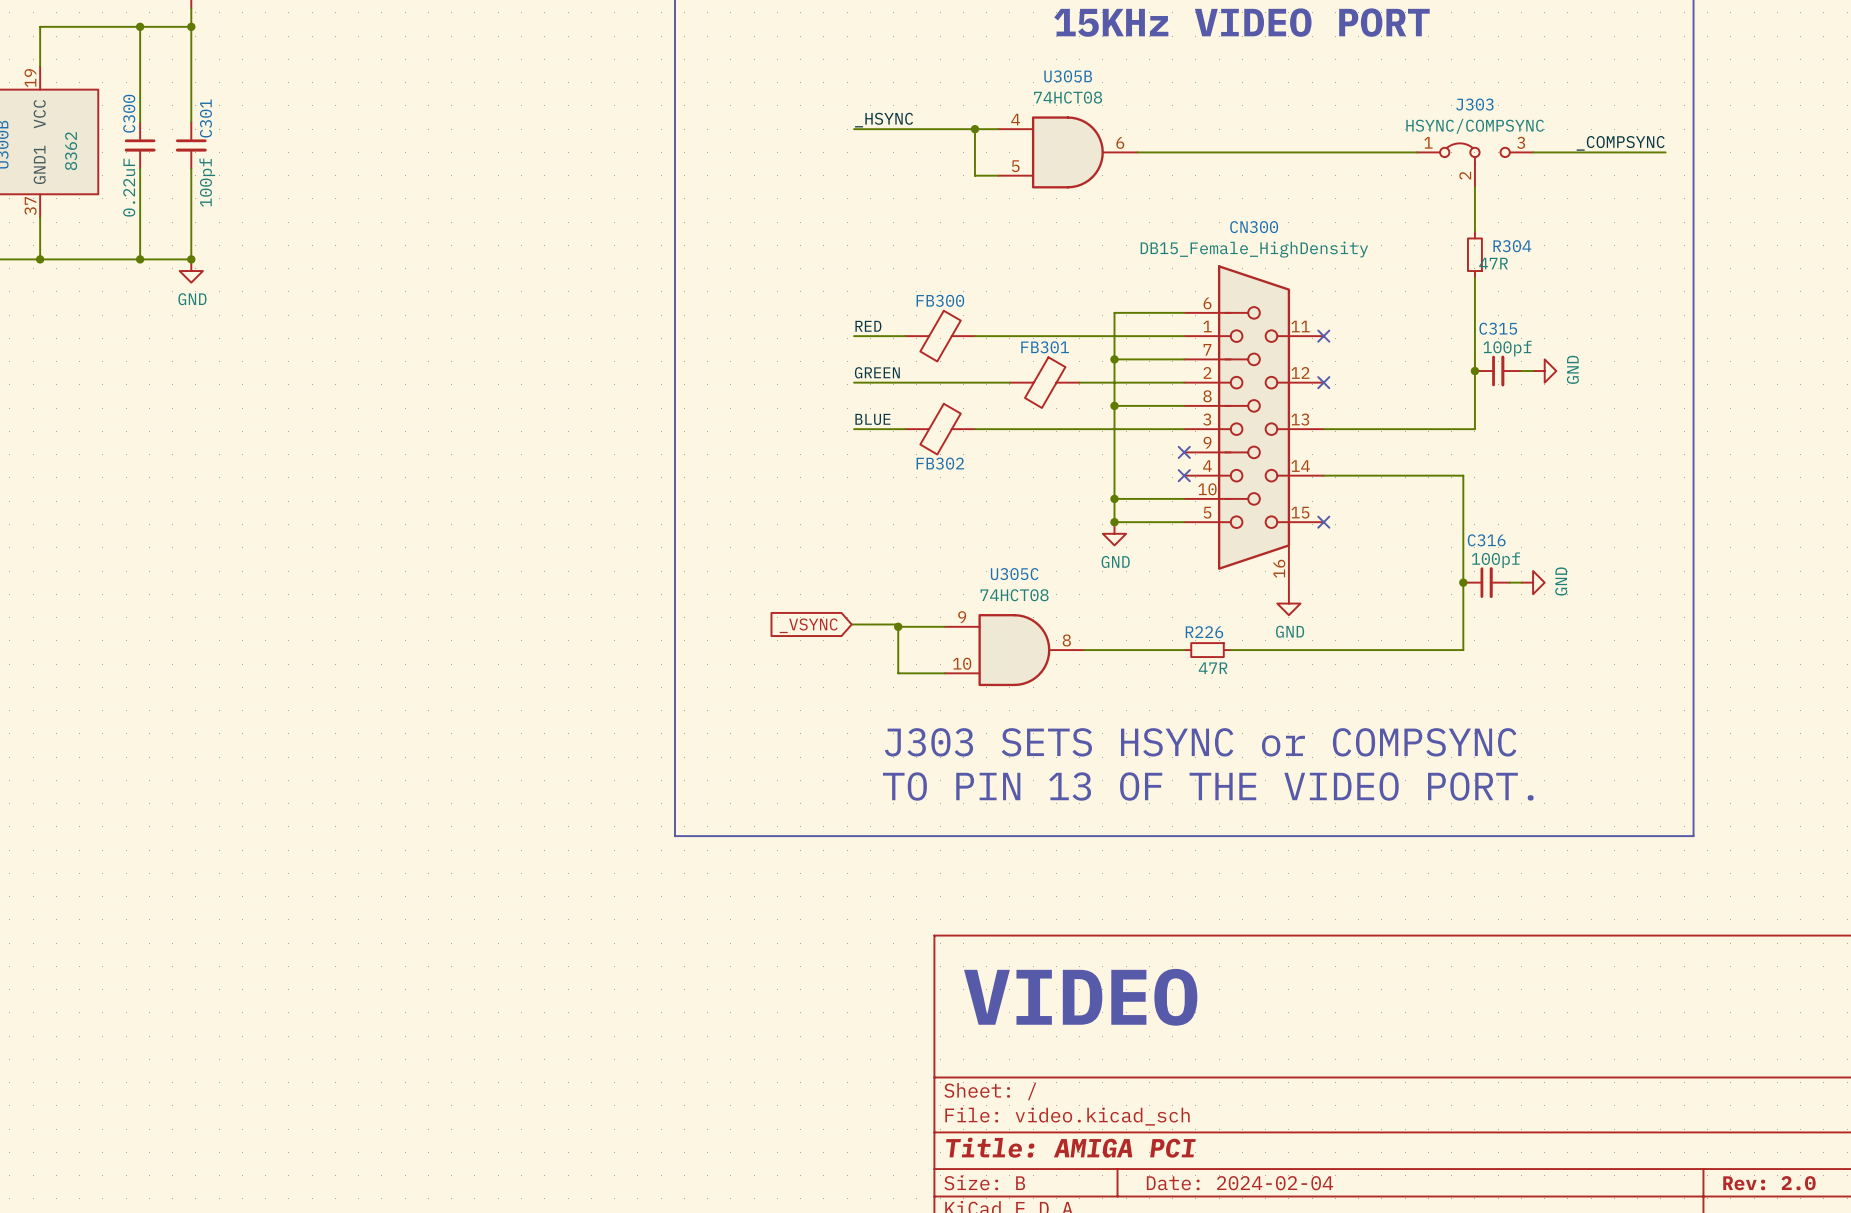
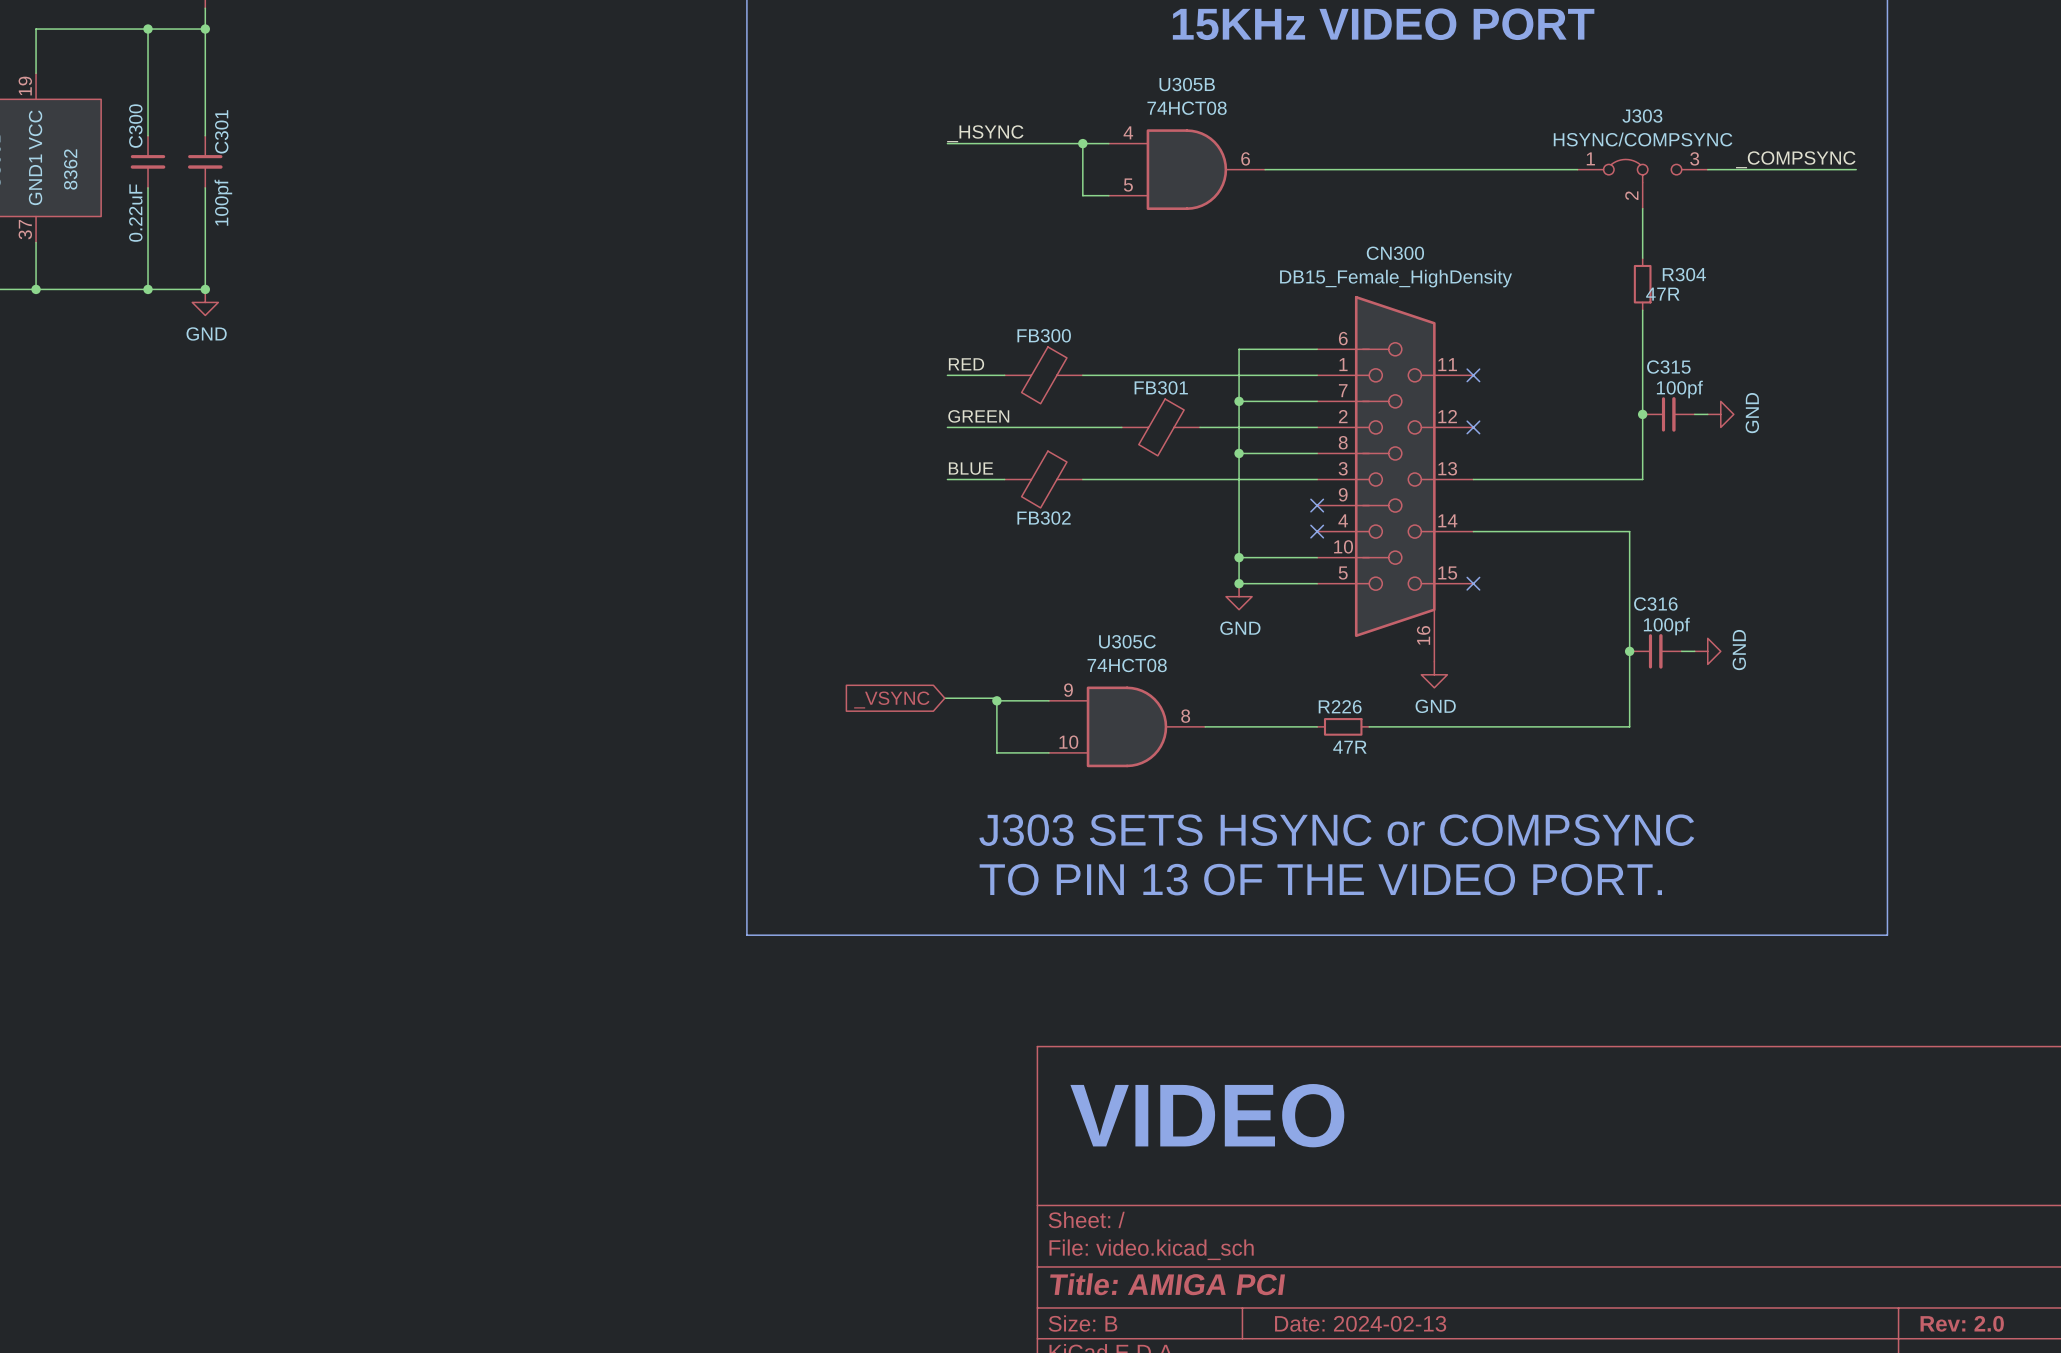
title block: Date: 2024-02-04 (1239, 1183) -> Date: 2024-02-13 (1360, 1323)

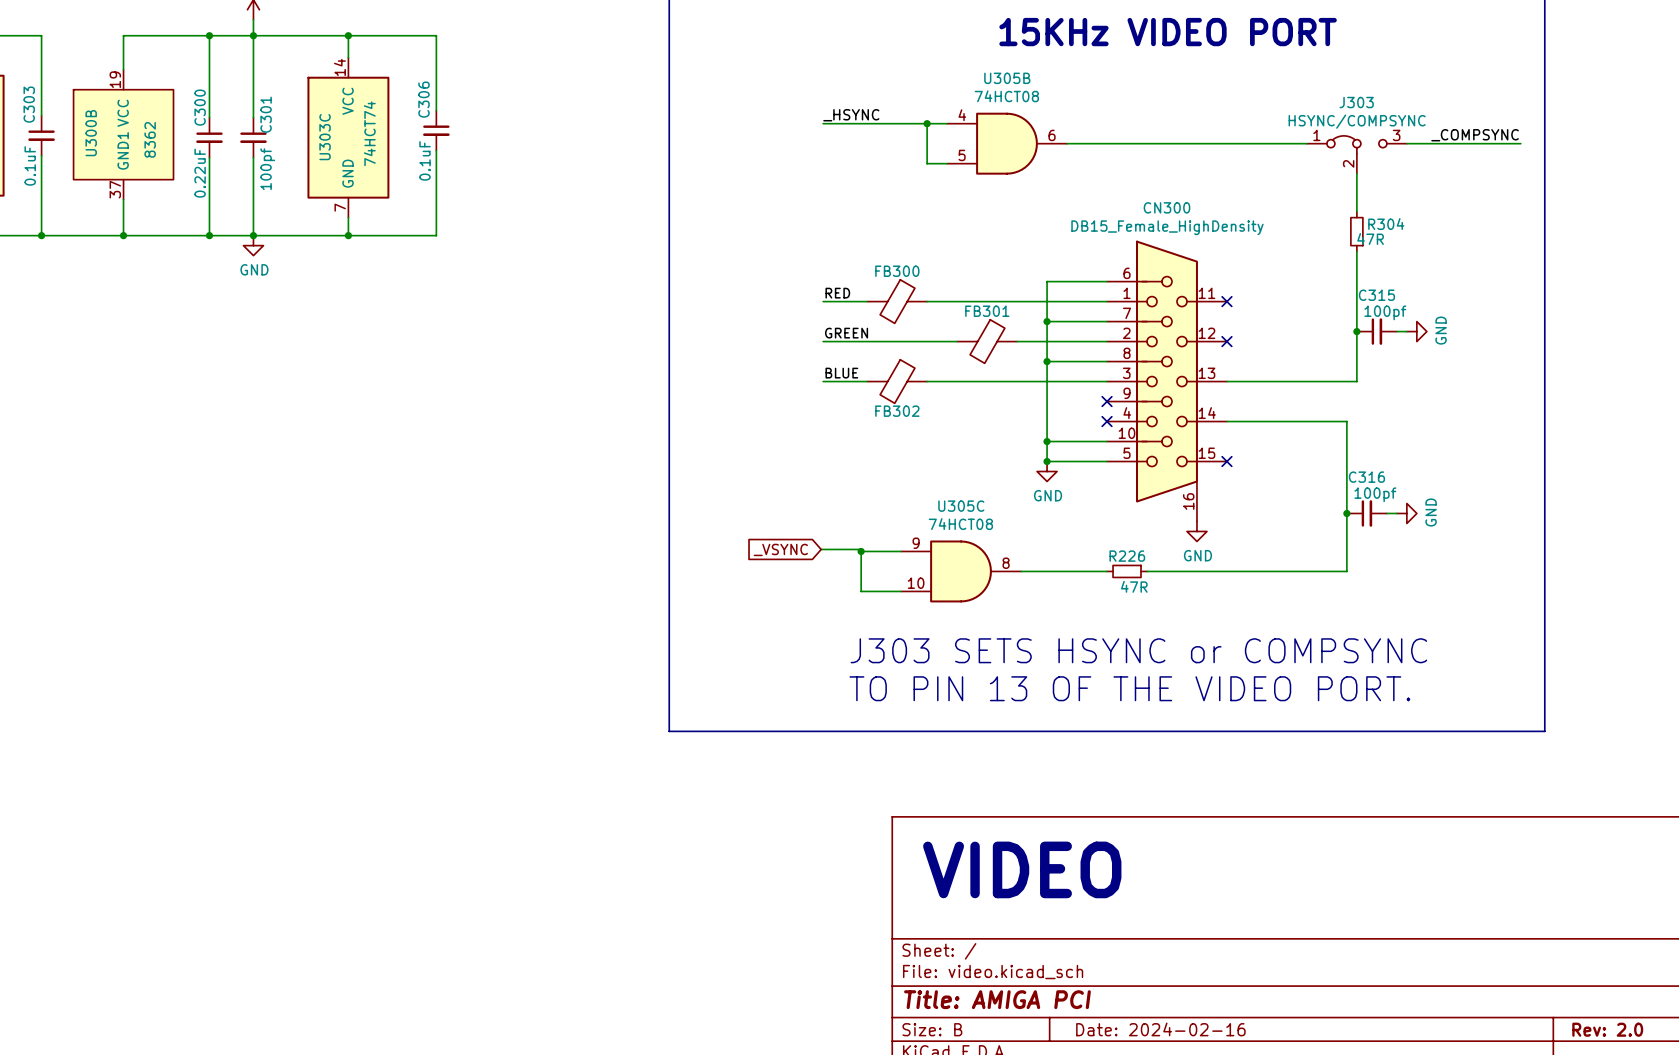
wire: none -> (253, 35) (436, 35) (436, 110)
wire: none -> (348, 35) (348, 57)
junction: none -> (348, 35)
C306: none -> 0.1uF (436, 130)
U303C: none -> 74HCT74 (348, 137)
wire: none -> (436, 150) (436, 235) (253, 235)
wire: none -> (348, 217) (348, 235)
junction: none -> (348, 235)
title block: Date: 2024-02-13 (1360, 1323) -> Date: 2024-02-16 (1160, 1029)

